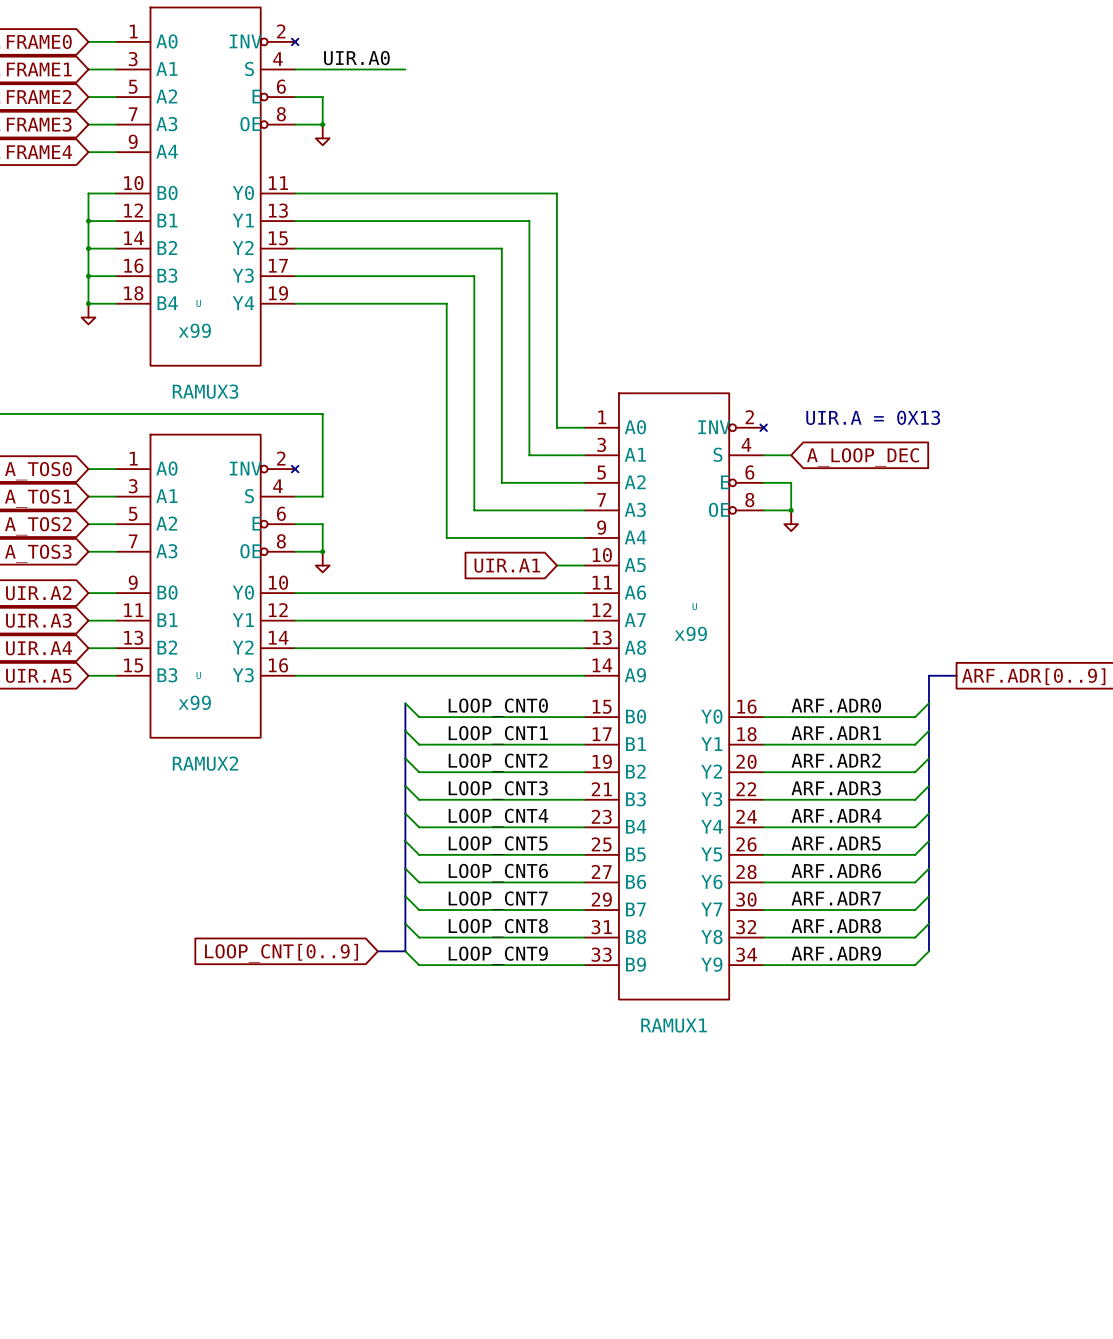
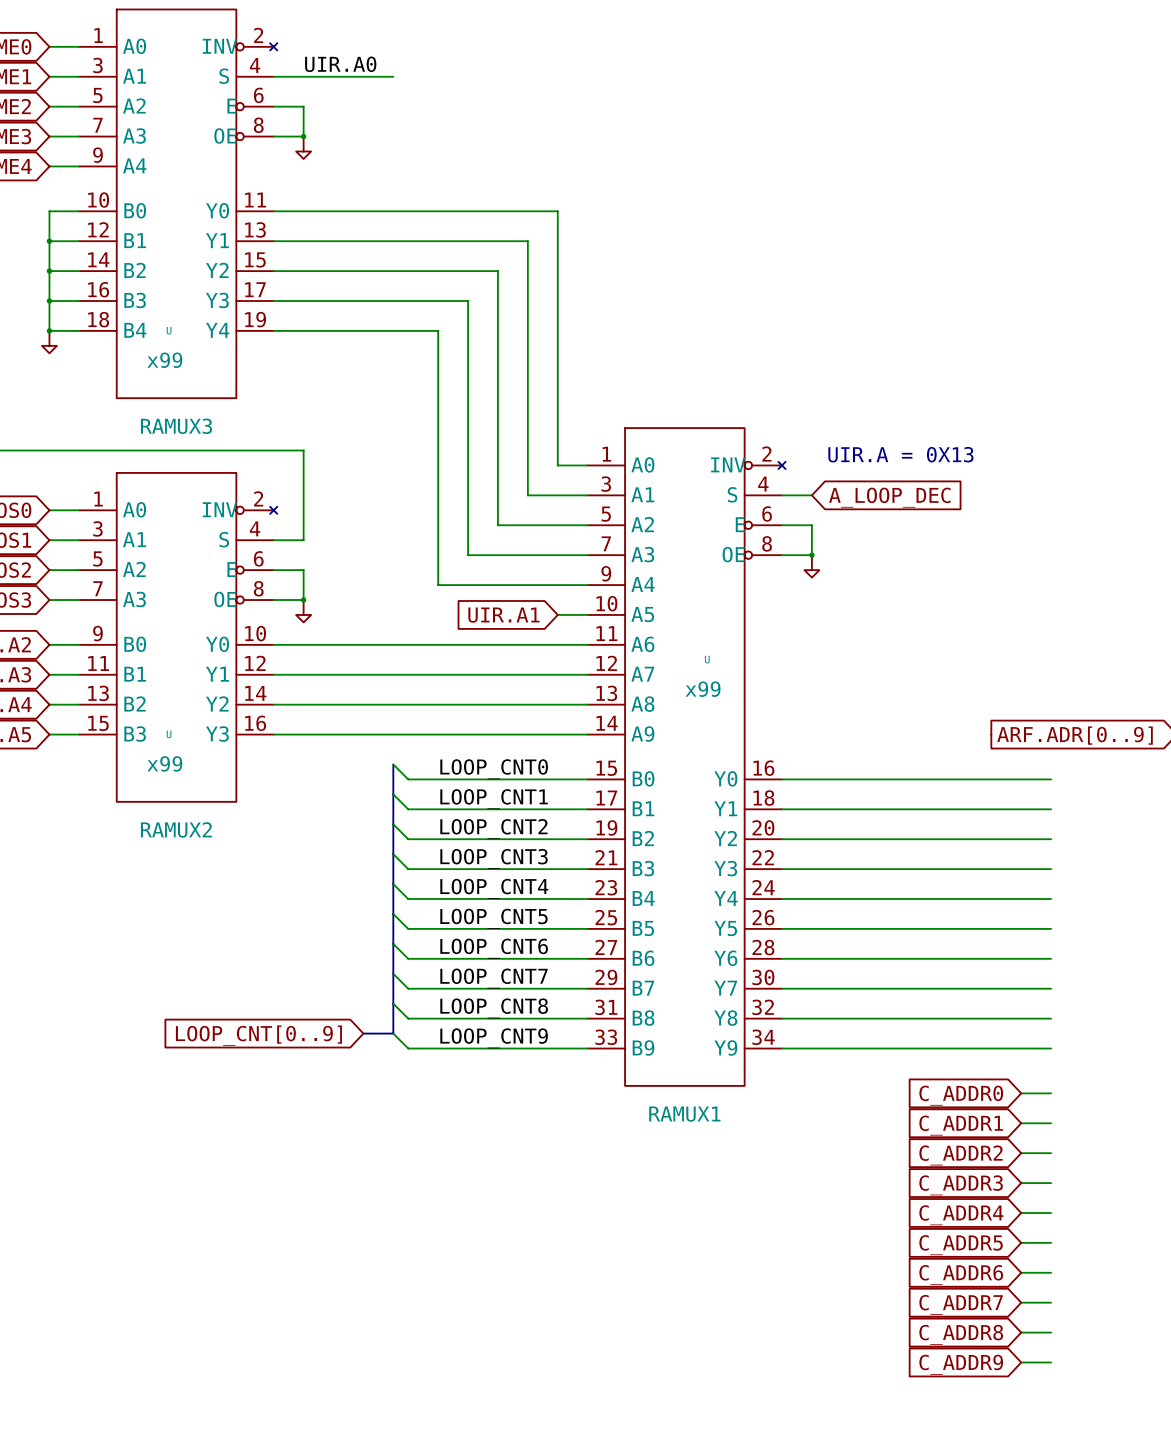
bus: (956, 675) (928, 675) (928, 951) -> none
wire: (928, 703) (915, 717) -> (1051, 779) (946, 779)
label: ARF.ADR0 (836, 705) -> none
wire: (928, 730) (915, 744) -> (1051, 809) (946, 809)
label: ARF.ADR1 (836, 733) -> none
wire: (928, 758) (915, 772) -> (1051, 839) (946, 839)
label: ARF.ADR2 (836, 760) -> none
wire: (928, 785) (915, 799) -> (1051, 869) (946, 869)
label: ARF.ADR3 (836, 788) -> none
wire: (928, 813) (915, 827) -> (1051, 899) (946, 899)
label: ARF.ADR4 (836, 815) -> none
wire: (928, 841) (915, 854) -> (1051, 928) (946, 928)
label: ARF.ADR5 (836, 843) -> none
wire: (928, 868) (915, 882) -> (1051, 958) (946, 958)
label: ARF.ADR6 (836, 870) -> none
wire: (928, 896) (915, 910) -> (1051, 988) (946, 988)
label: ARF.ADR7 (836, 898) -> none
wire: (928, 923) (915, 937) -> (1051, 1018) (946, 1018)
label: ARF.ADR8 (836, 926) -> none
wire: (928, 951) (915, 965) -> (1051, 1048) (946, 1048)
label: ARF.ADR9 (836, 953) -> none
wire: none -> (1021, 1093) (1051, 1093)
global label: none -> C_ADDR0 (961, 1095)
wire: none -> (1021, 1123) (1051, 1123)
global label: none -> C_ADDR1 (961, 1125)
wire: none -> (1021, 1153) (1051, 1153)
global label: none -> C_ADDR2 (961, 1155)
wire: none -> (1021, 1183) (1051, 1183)
global label: none -> C_ADDR3 (961, 1185)
wire: none -> (1021, 1212) (1051, 1212)
global label: none -> C_ADDR4 (961, 1215)
wire: none -> (1021, 1242) (1051, 1242)
global label: none -> C_ADDR5 (961, 1245)
wire: none -> (1021, 1272) (1051, 1272)
global label: none -> C_ADDR6 (961, 1275)
wire: none -> (1021, 1302) (1051, 1302)
global label: none -> C_ADDR7 (961, 1304)
wire: none -> (1021, 1332) (1051, 1332)
global label: none -> C_ADDR8 (961, 1334)
wire: none -> (1021, 1362) (1051, 1362)
global label: none -> C_ADDR9 (961, 1364)

